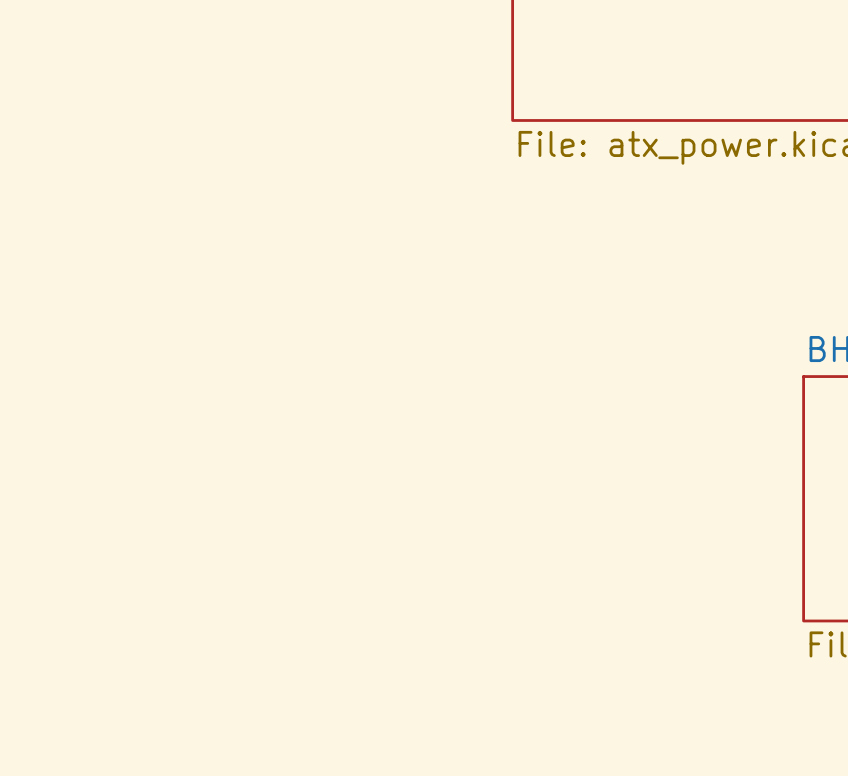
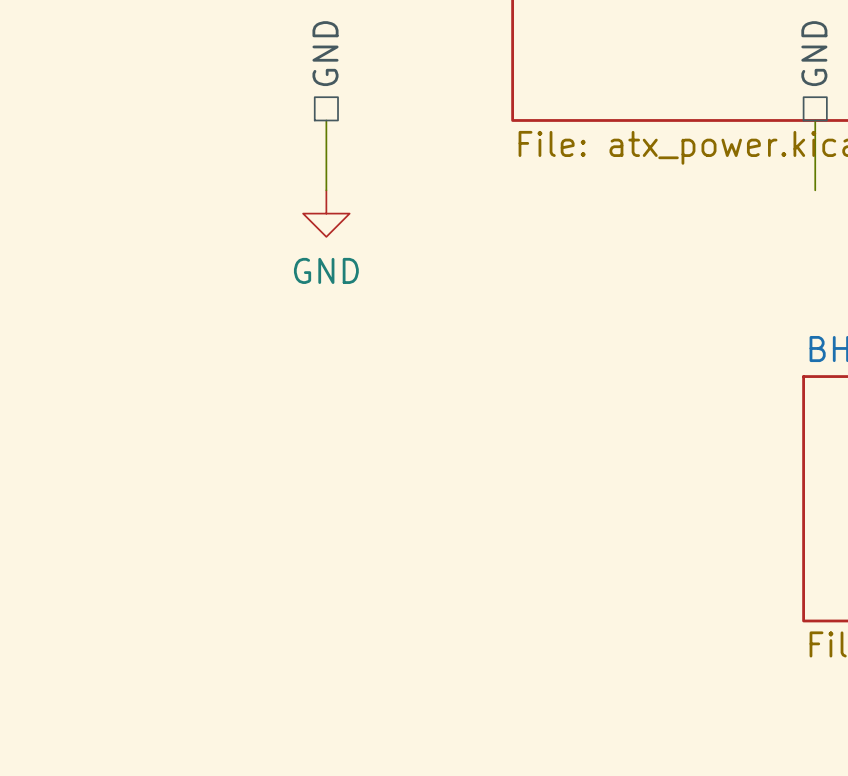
sheet pin: none -> GND (325, 53)
sheet pin: none -> GND (814, 53)
wire: none -> (326, 120) (326, 190)
wire: none -> (815, 120) (815, 190)
power symbol: none -> GND (326, 213)

